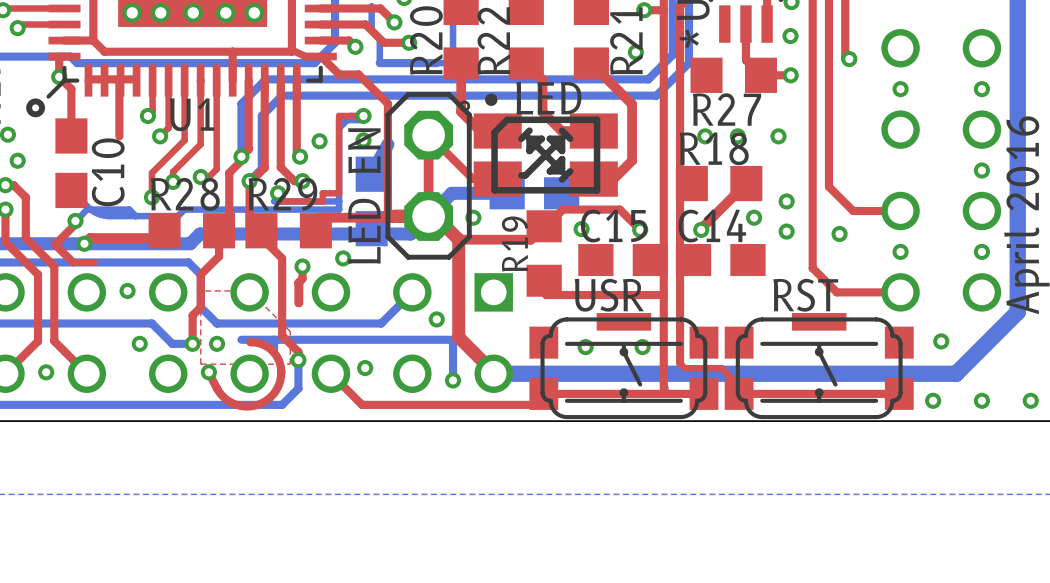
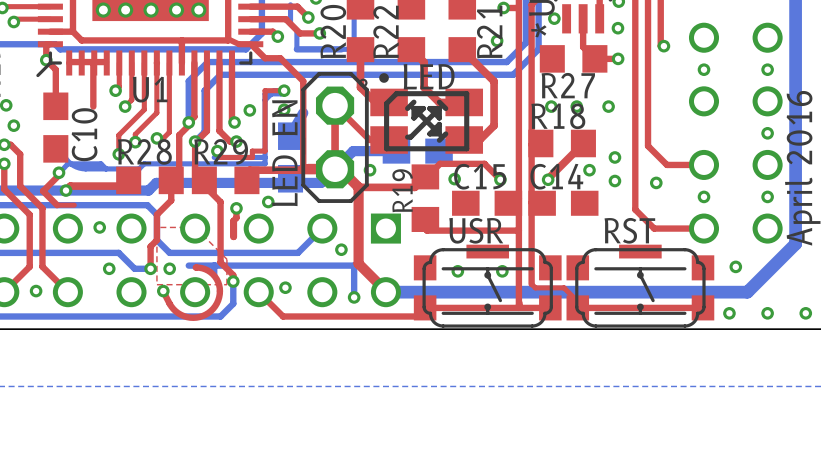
via: none -> (554, 18)
drawing: [26, 98, 46, 118] -> none

